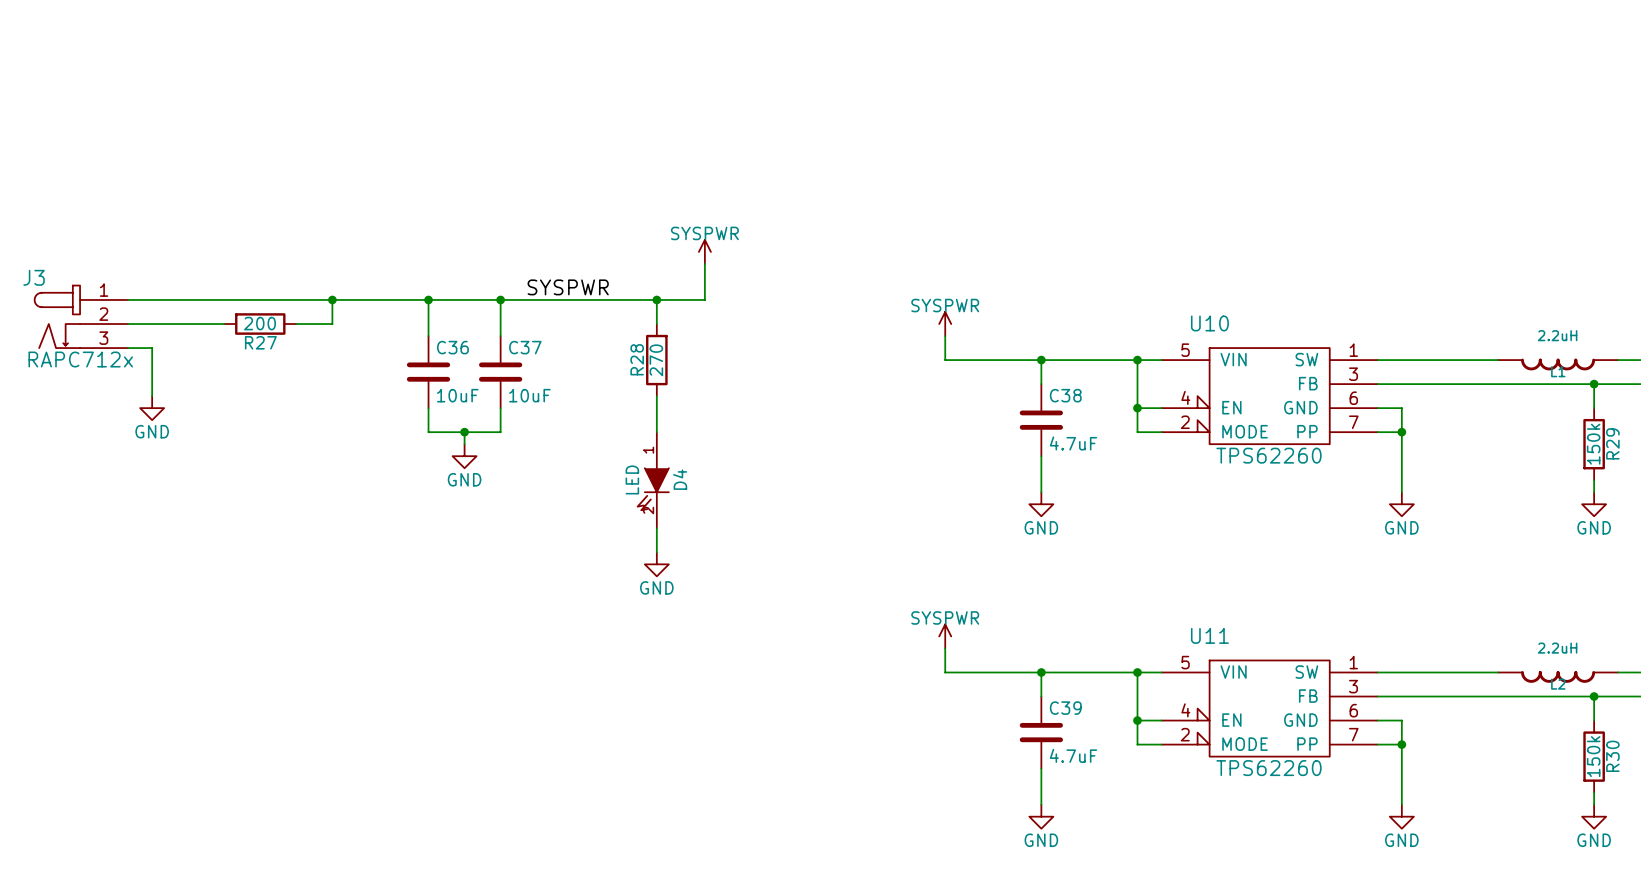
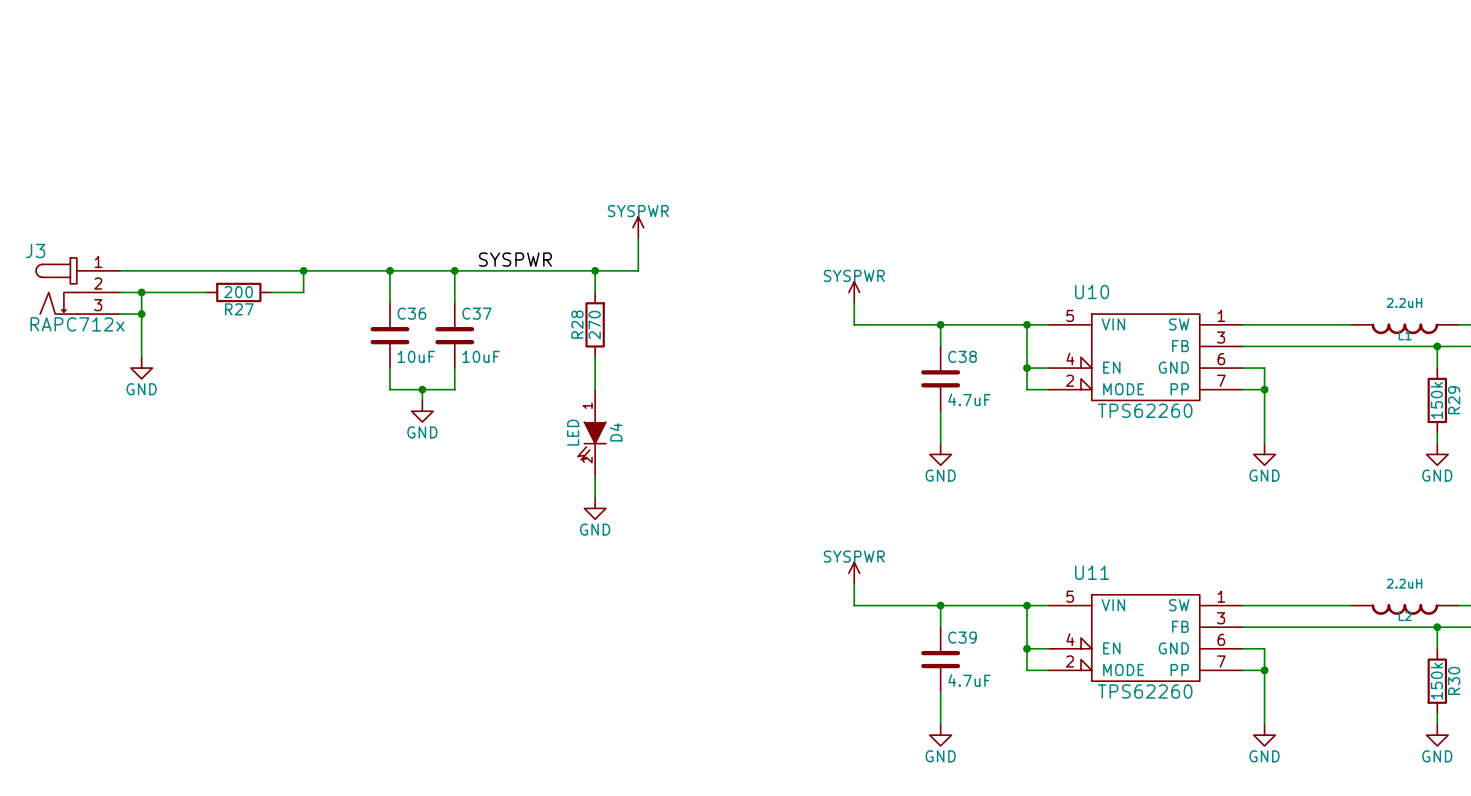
wire: none -> (141, 292) (141, 314)
junction: none -> (141, 292)
junction: none -> (141, 314)

